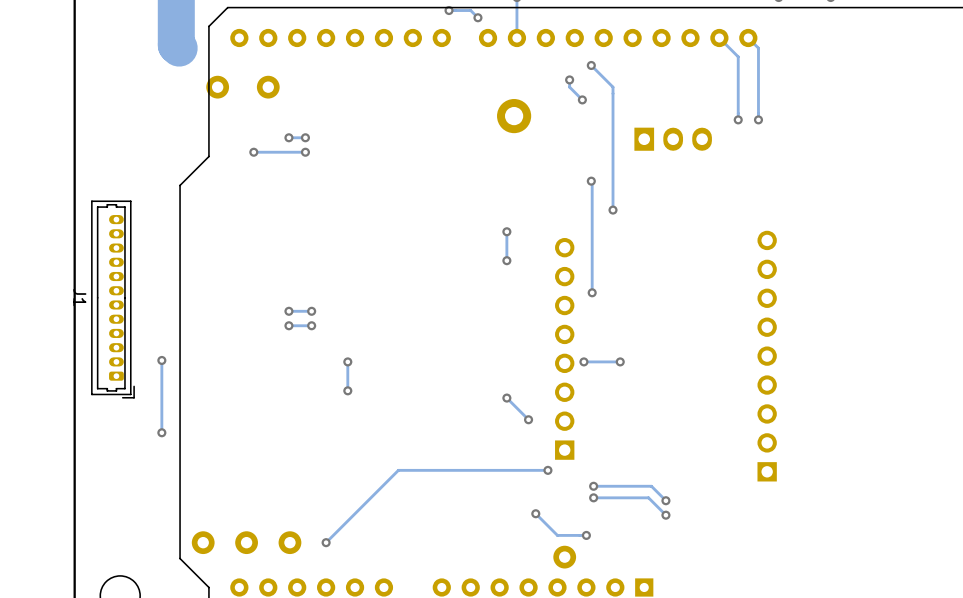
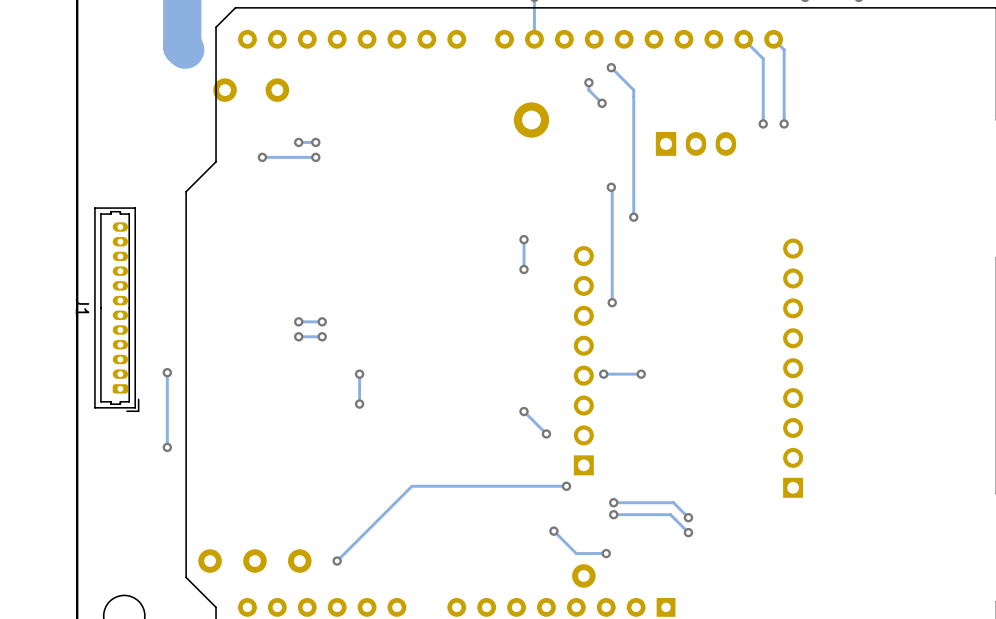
track: (449, 10) (470, 10) (477, 17) -> none
via: (449, 10) -> none
via: (477, 17) -> none

